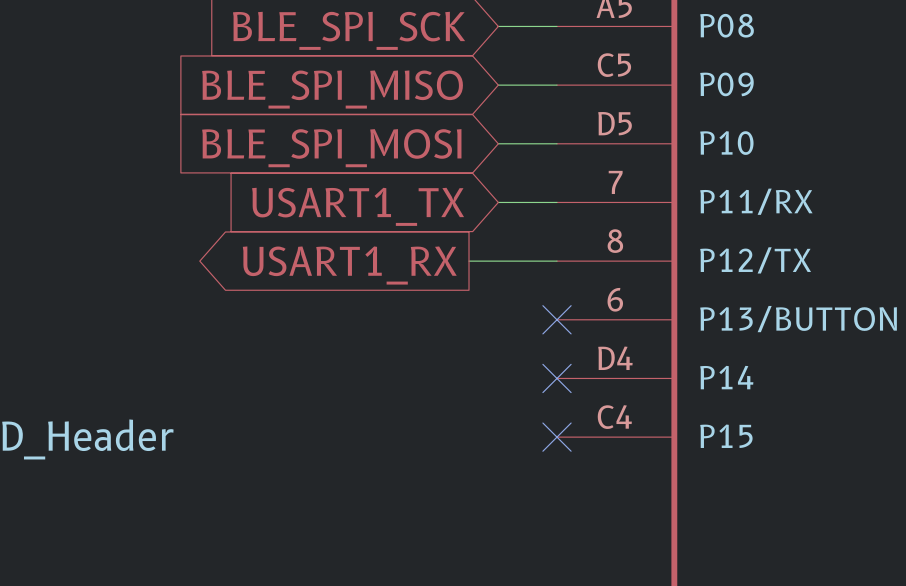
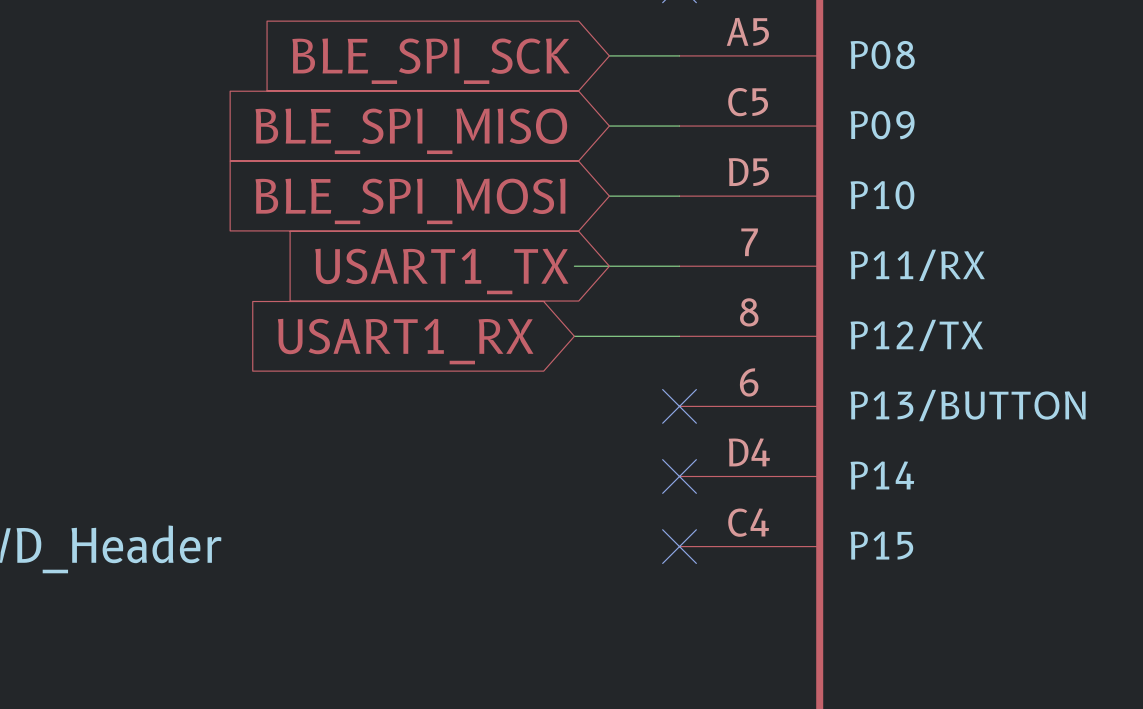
wire: none -> (574, 266) (609, 266)
global label shape: output (349, 265) -> input (405, 341)

